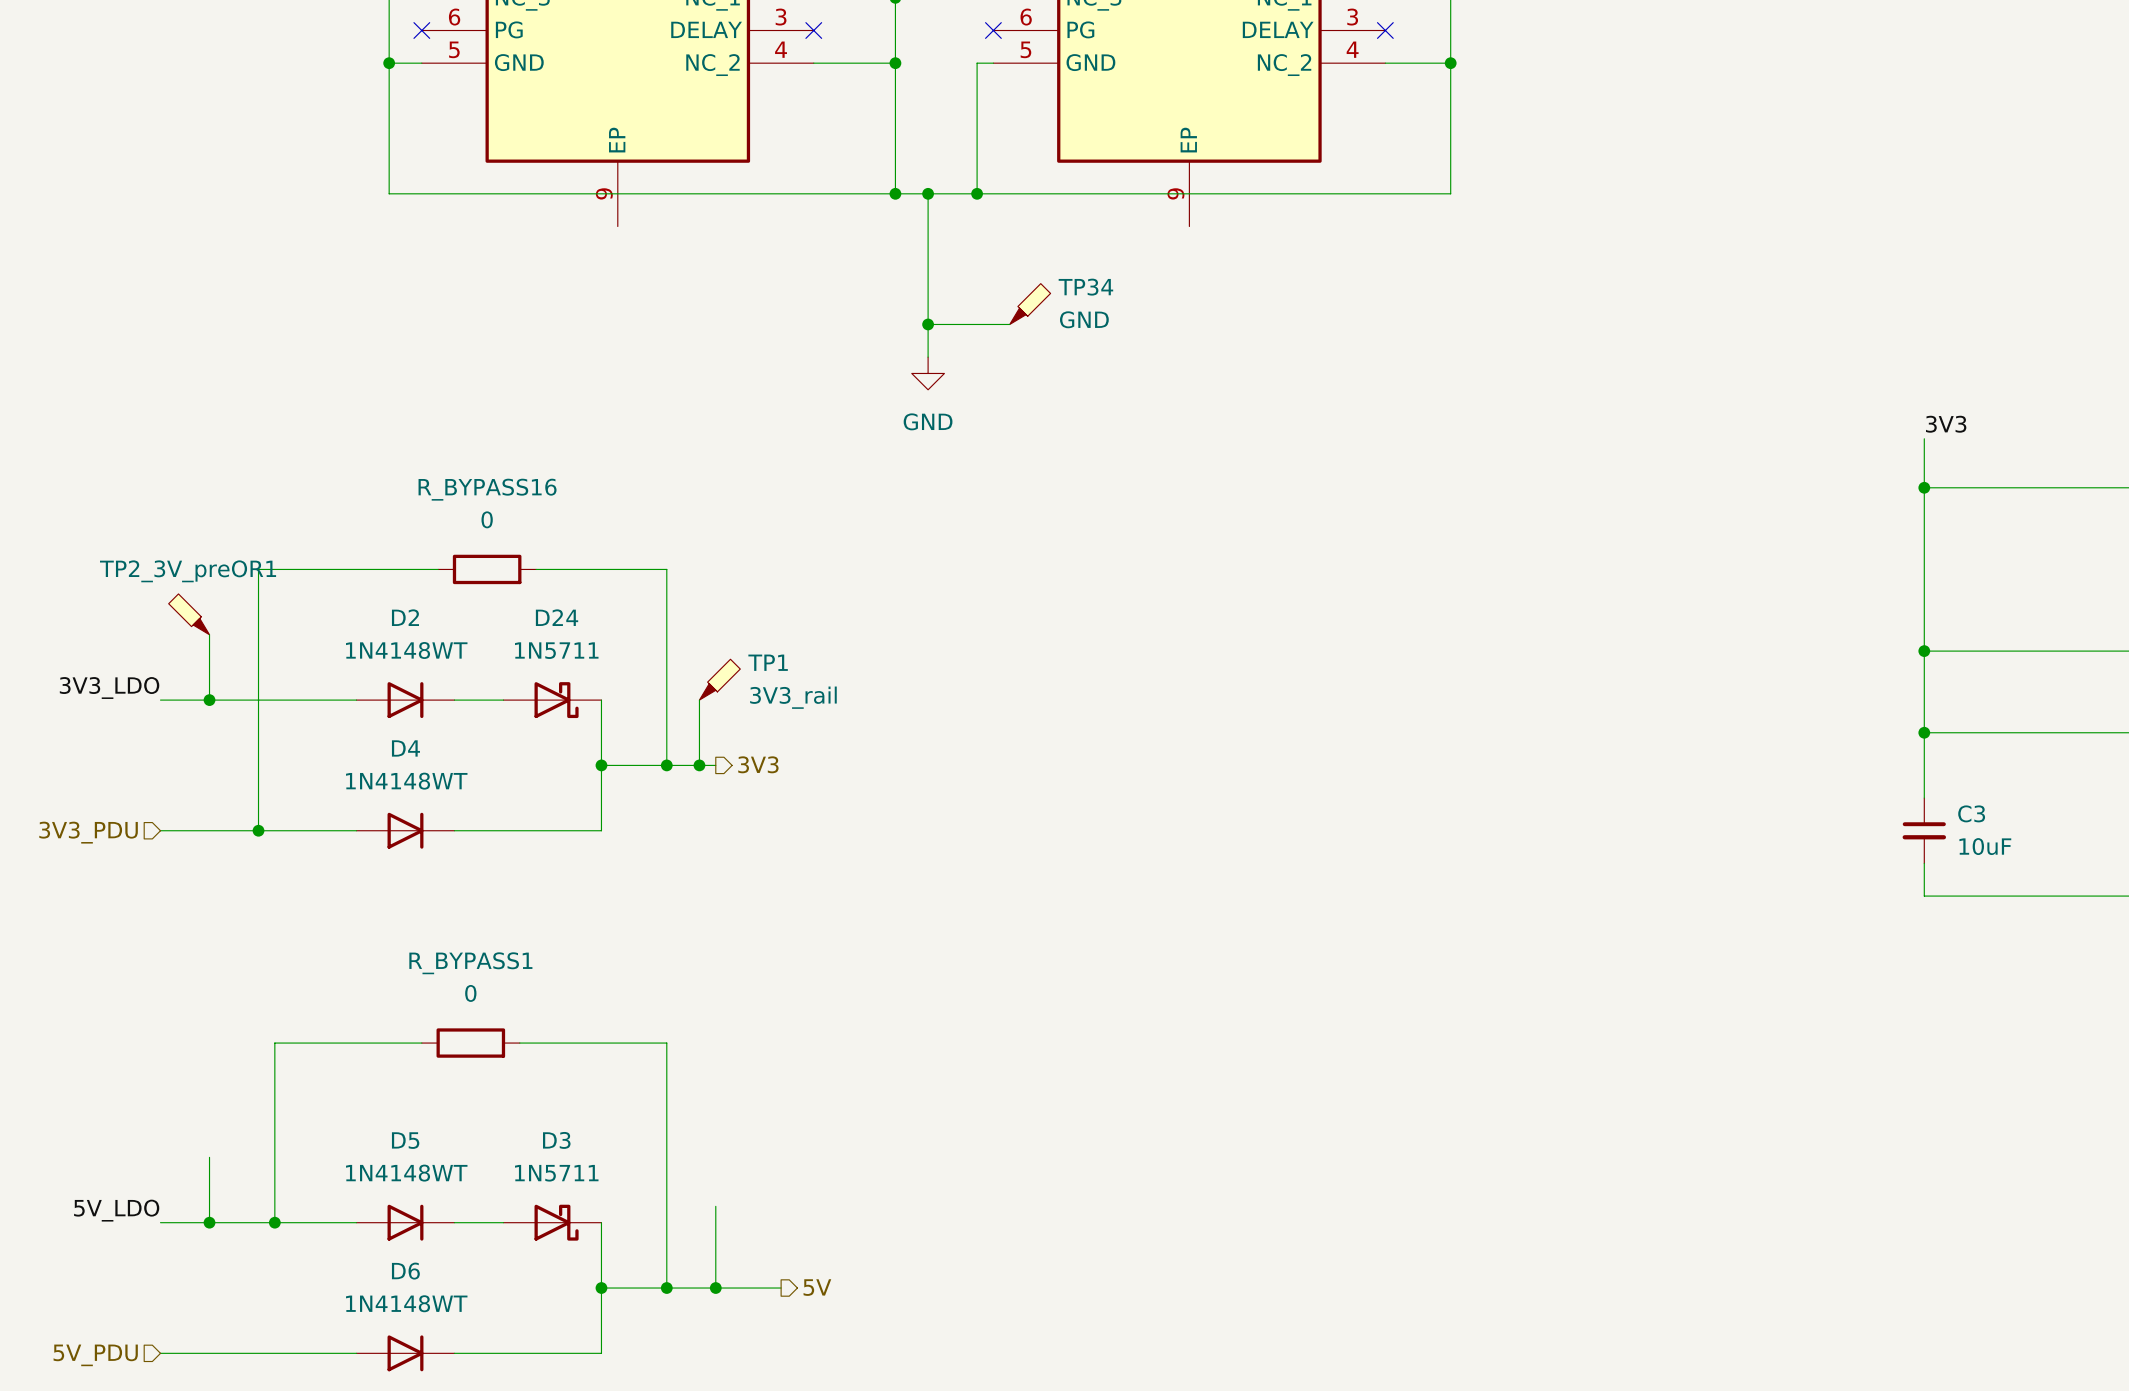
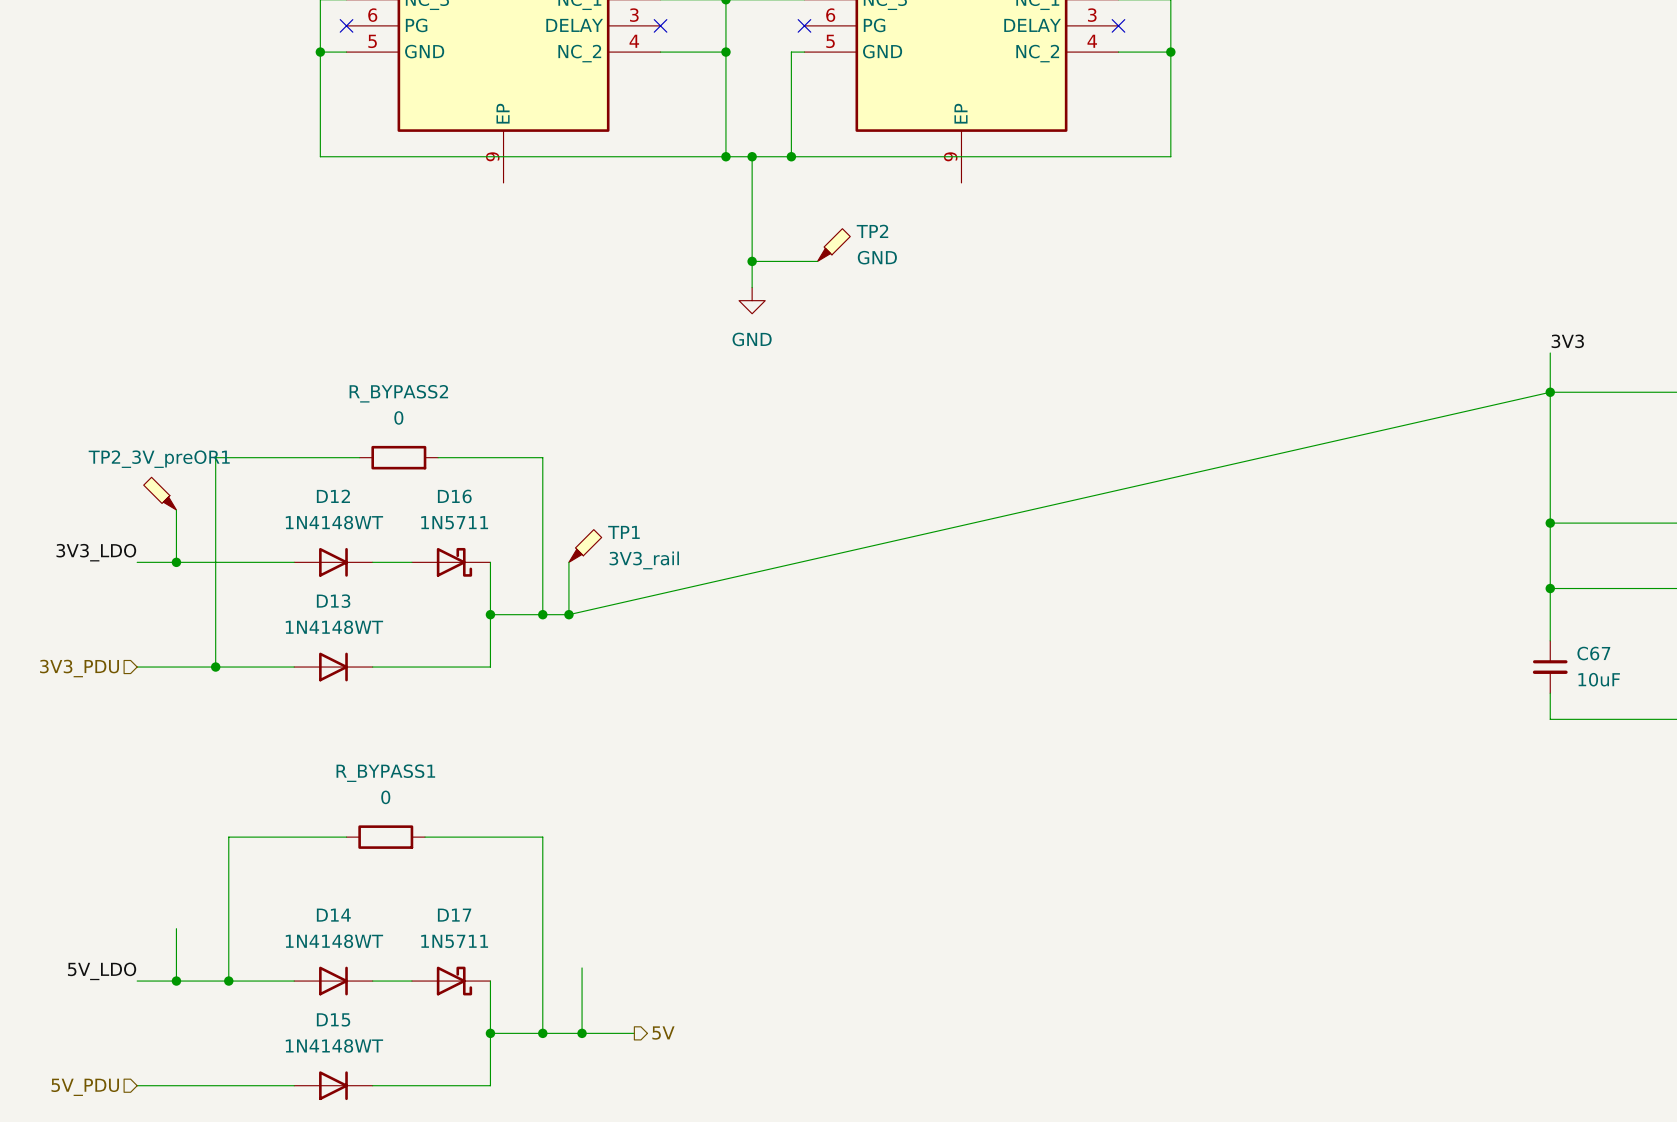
TP34 name: TP34 (1085, 287) -> TP2 (872, 231)
R_BYPASS16 name: R_BYPASS16 (487, 489) -> R_BYPASS2 (398, 393)
D2 name: D2 (405, 617) -> D12 (333, 496)
D24 name: D24 (557, 617) -> D16 (454, 496)
D4 name: D4 (405, 748) -> D13 (333, 601)
hierarchical label: 3V3 (758, 764) -> none
wire: (699, 765) (715, 765) -> (568, 614) (1550, 392)
C3 name: C3 (1971, 813) -> C67 (1593, 653)
D5 name: D5 (405, 1140) -> D14 (333, 915)
D3 name: D3 (556, 1140) -> D17 (454, 915)
D6 name: D6 (405, 1271) -> D15 (333, 1019)

